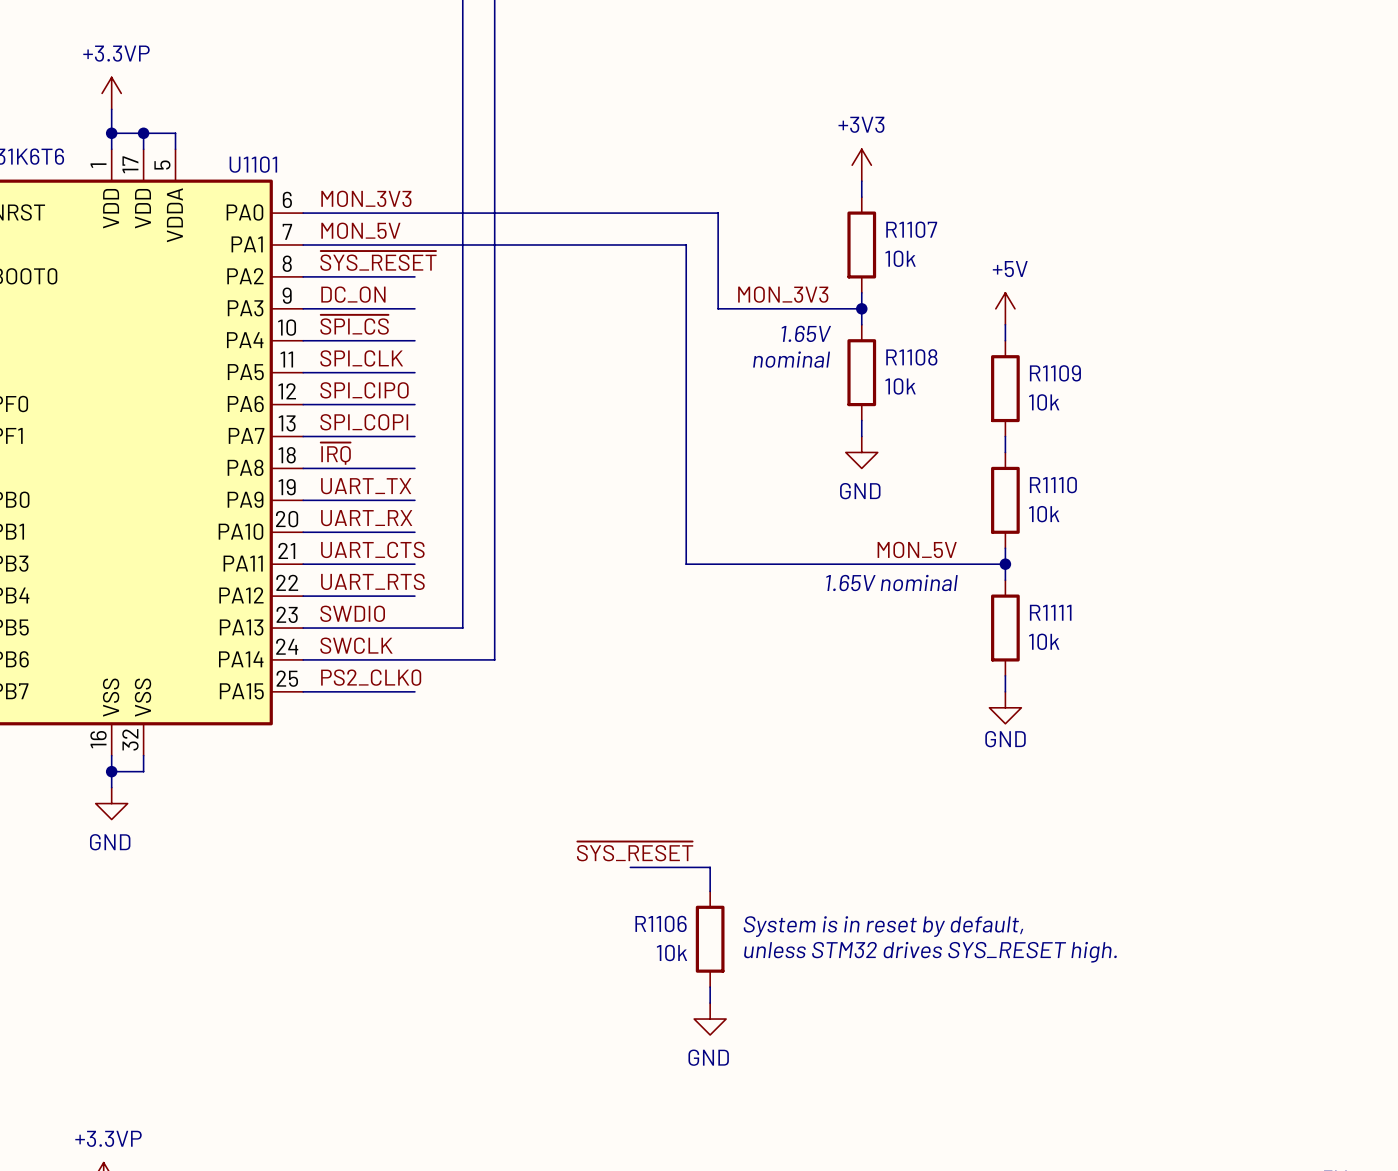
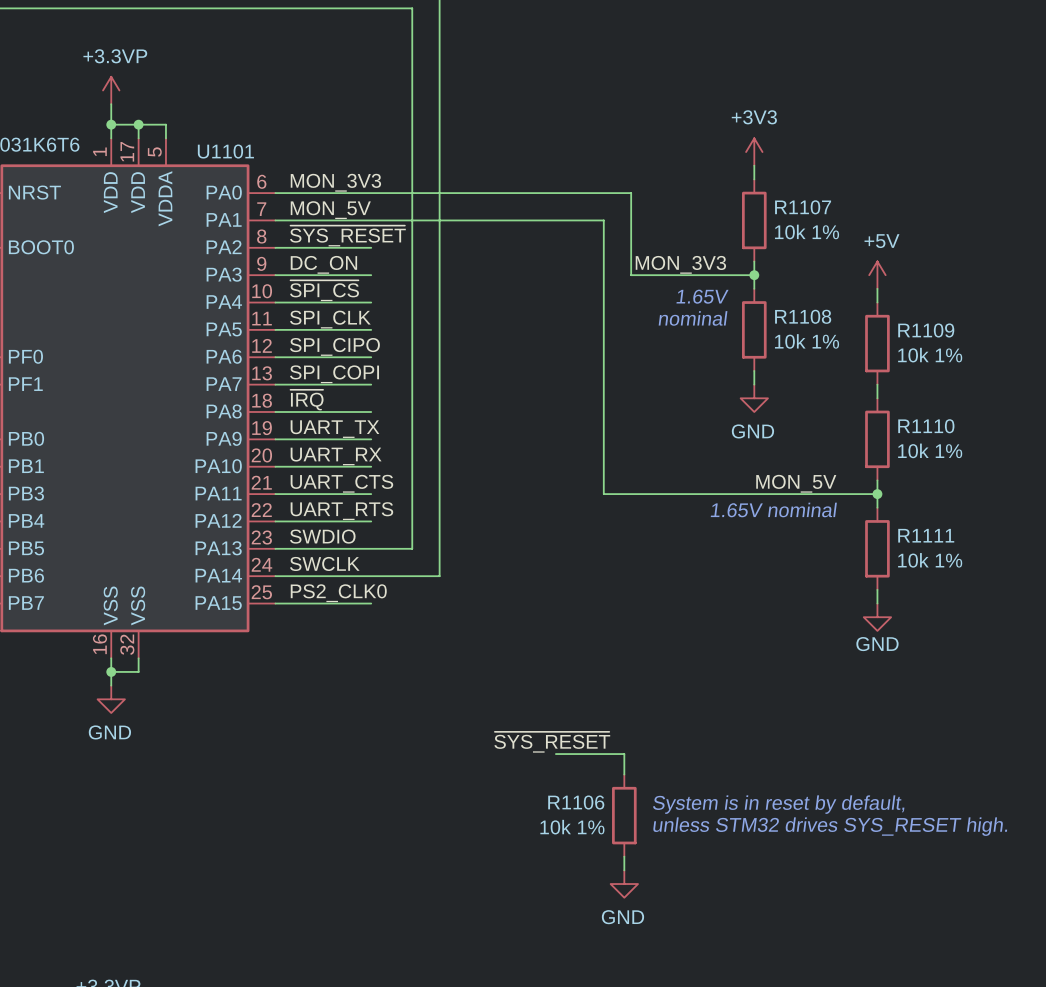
R1107 value: 10k (900, 258) -> 10k 1% (807, 231)
R1108 value: 10k (900, 386) -> 10k 1% (807, 341)
R1109 value: 10k (1044, 402) -> 10k 1% (930, 355)
R1110 value: 10k (1044, 514) -> 10k 1% (930, 450)
R1111 value: 10k (1044, 641) -> 10k 1% (930, 560)
R1106 value: 10k (671, 953) -> 10k 1% (572, 827)

